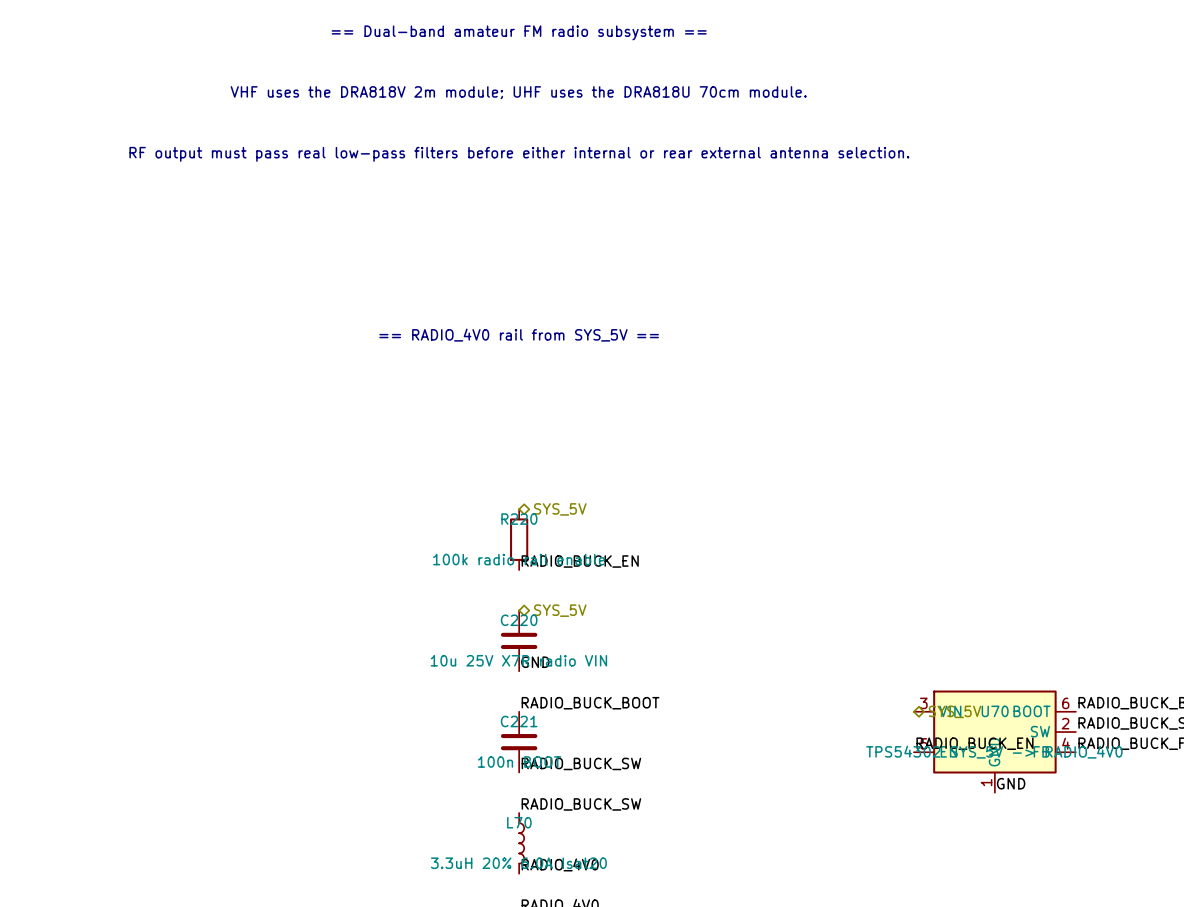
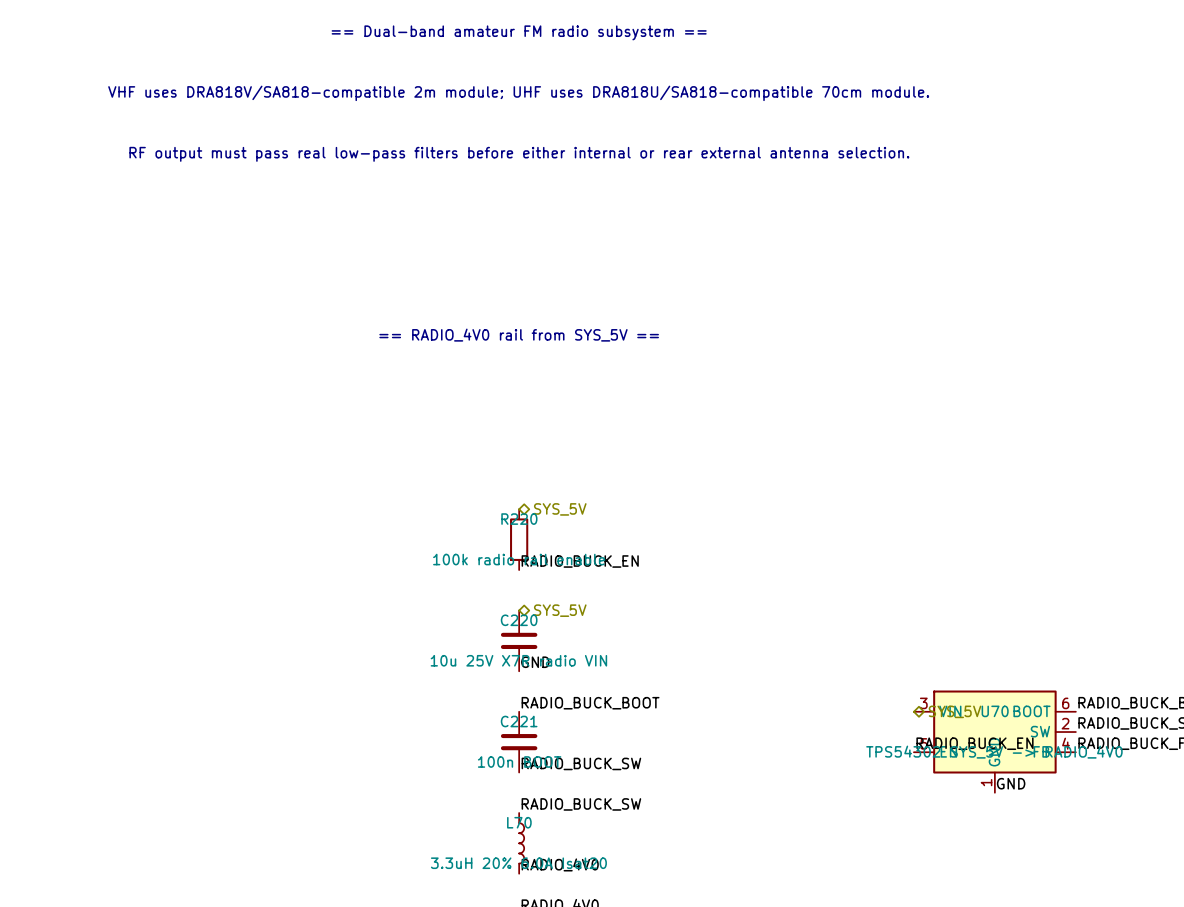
text: VHF uses the DRA818V 2m module; UHF uses the DRA818U 70cm module. (518, 92) -> VHF uses DRA818V/SA818-compatible 2m module; UHF uses DRA818U/SA818-compatible 70cm module. (518, 93)

